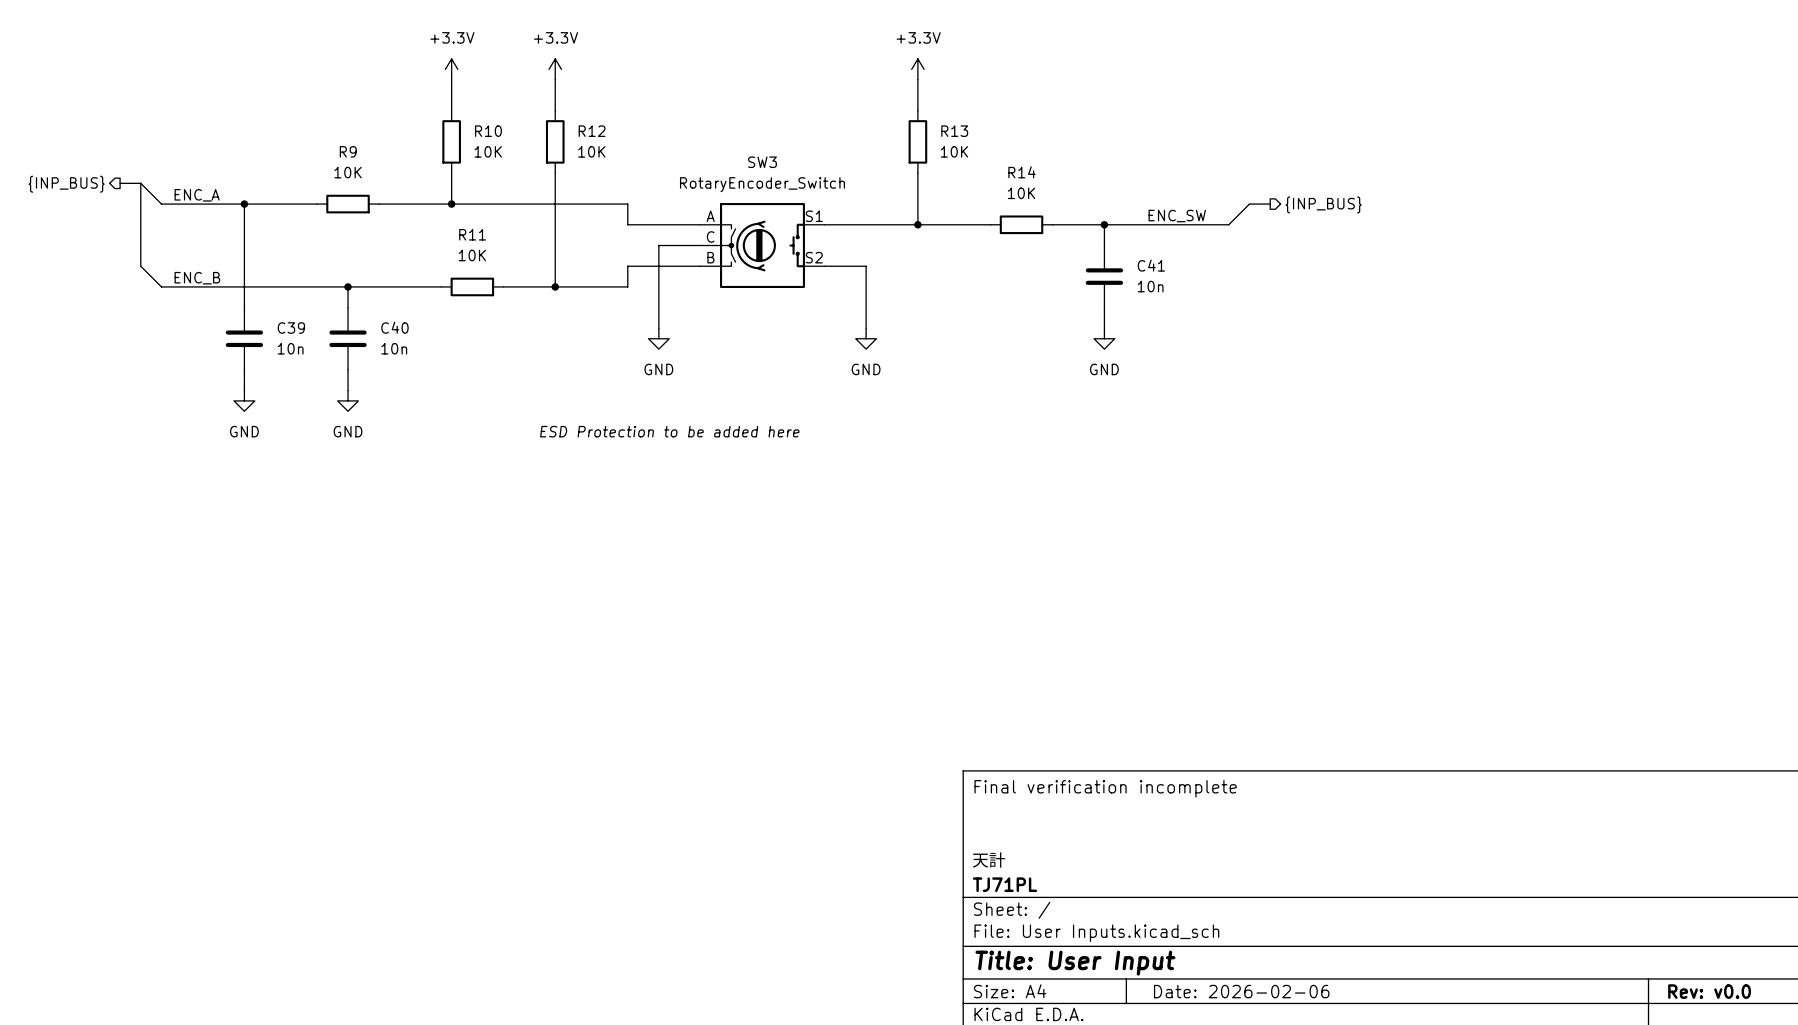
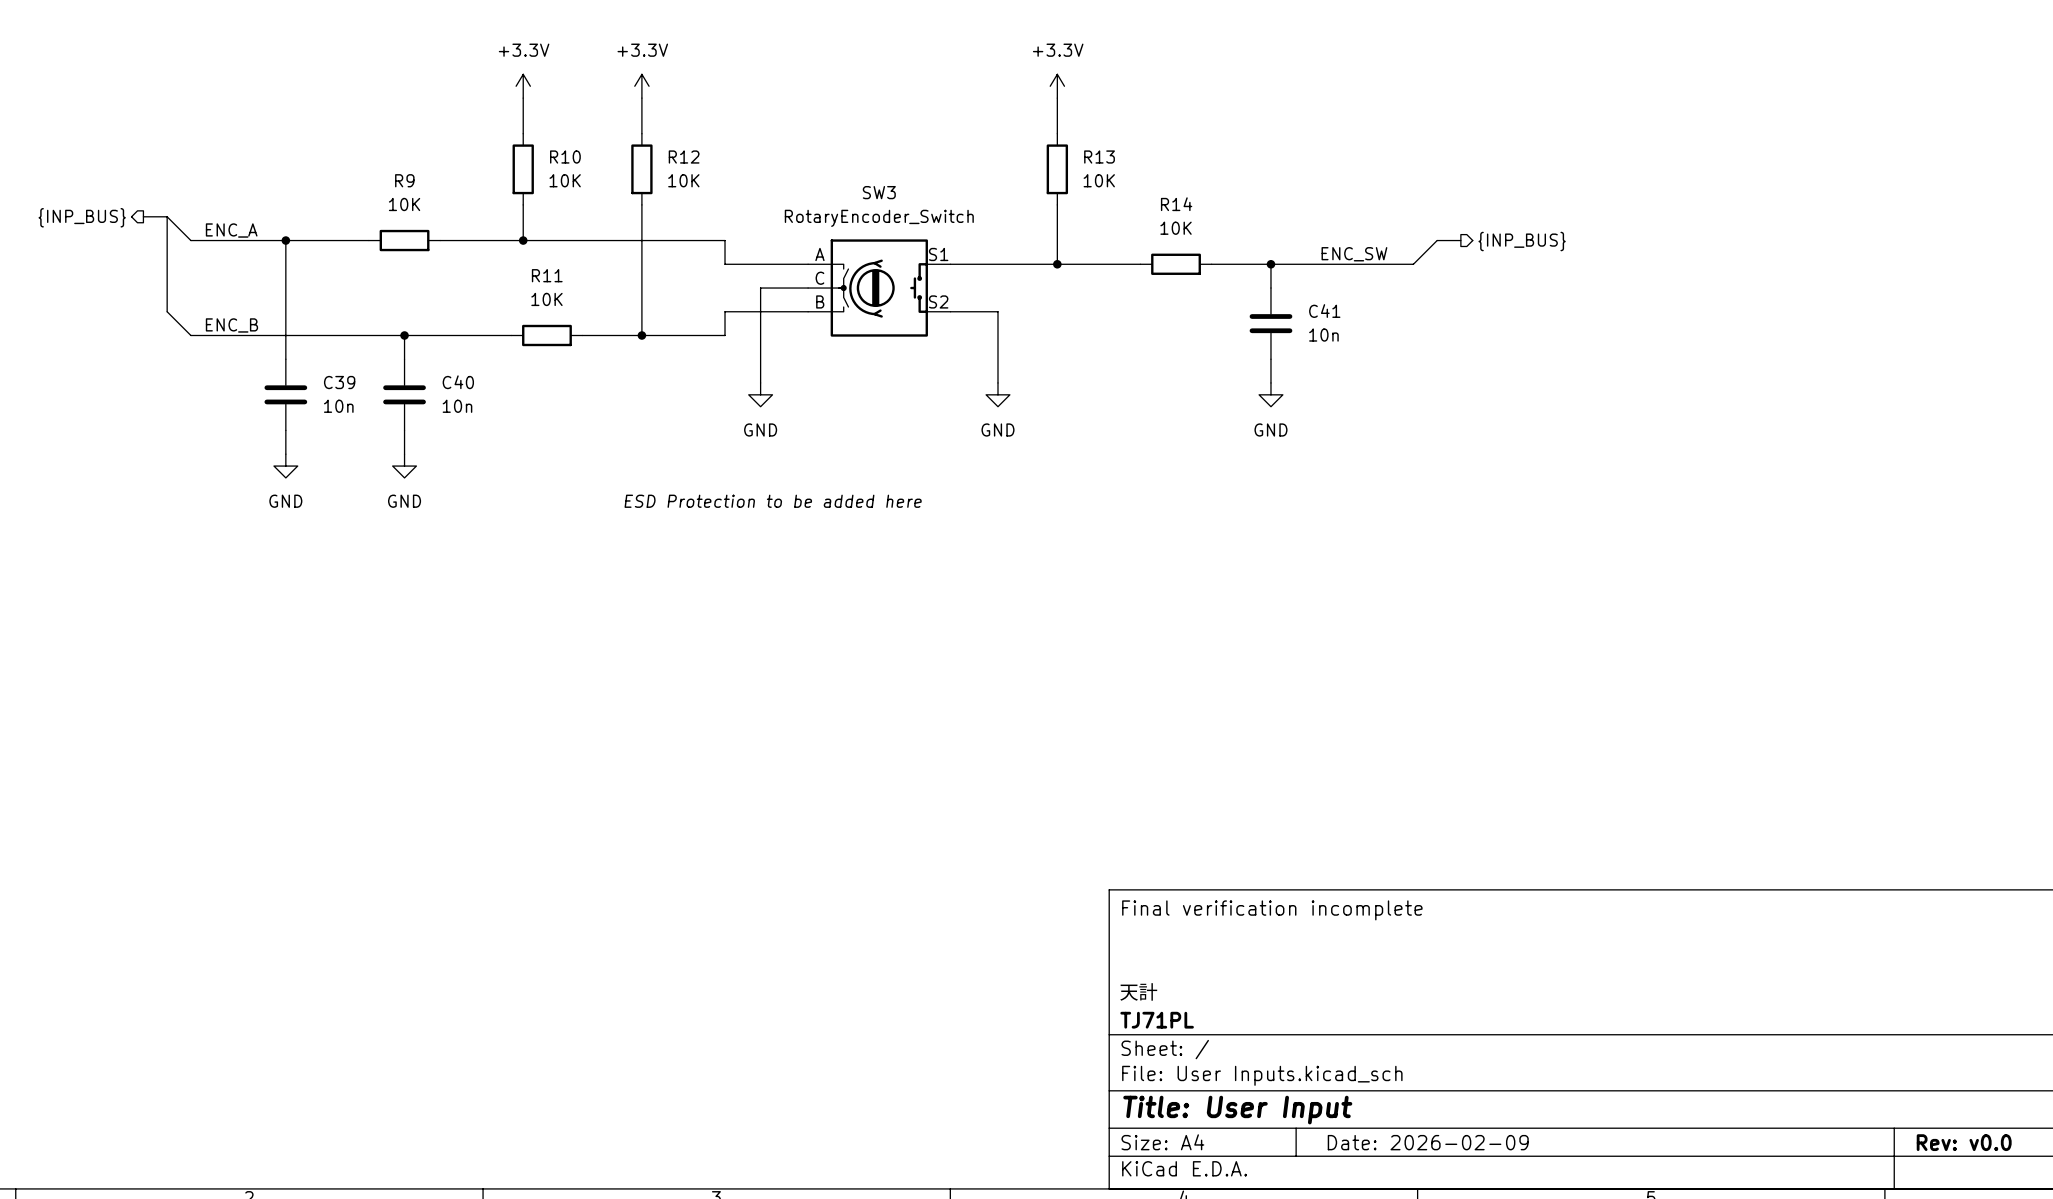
title block: Date: 2026-02-06 (1241, 991) -> Date: 2026-02-09 (1428, 1142)

